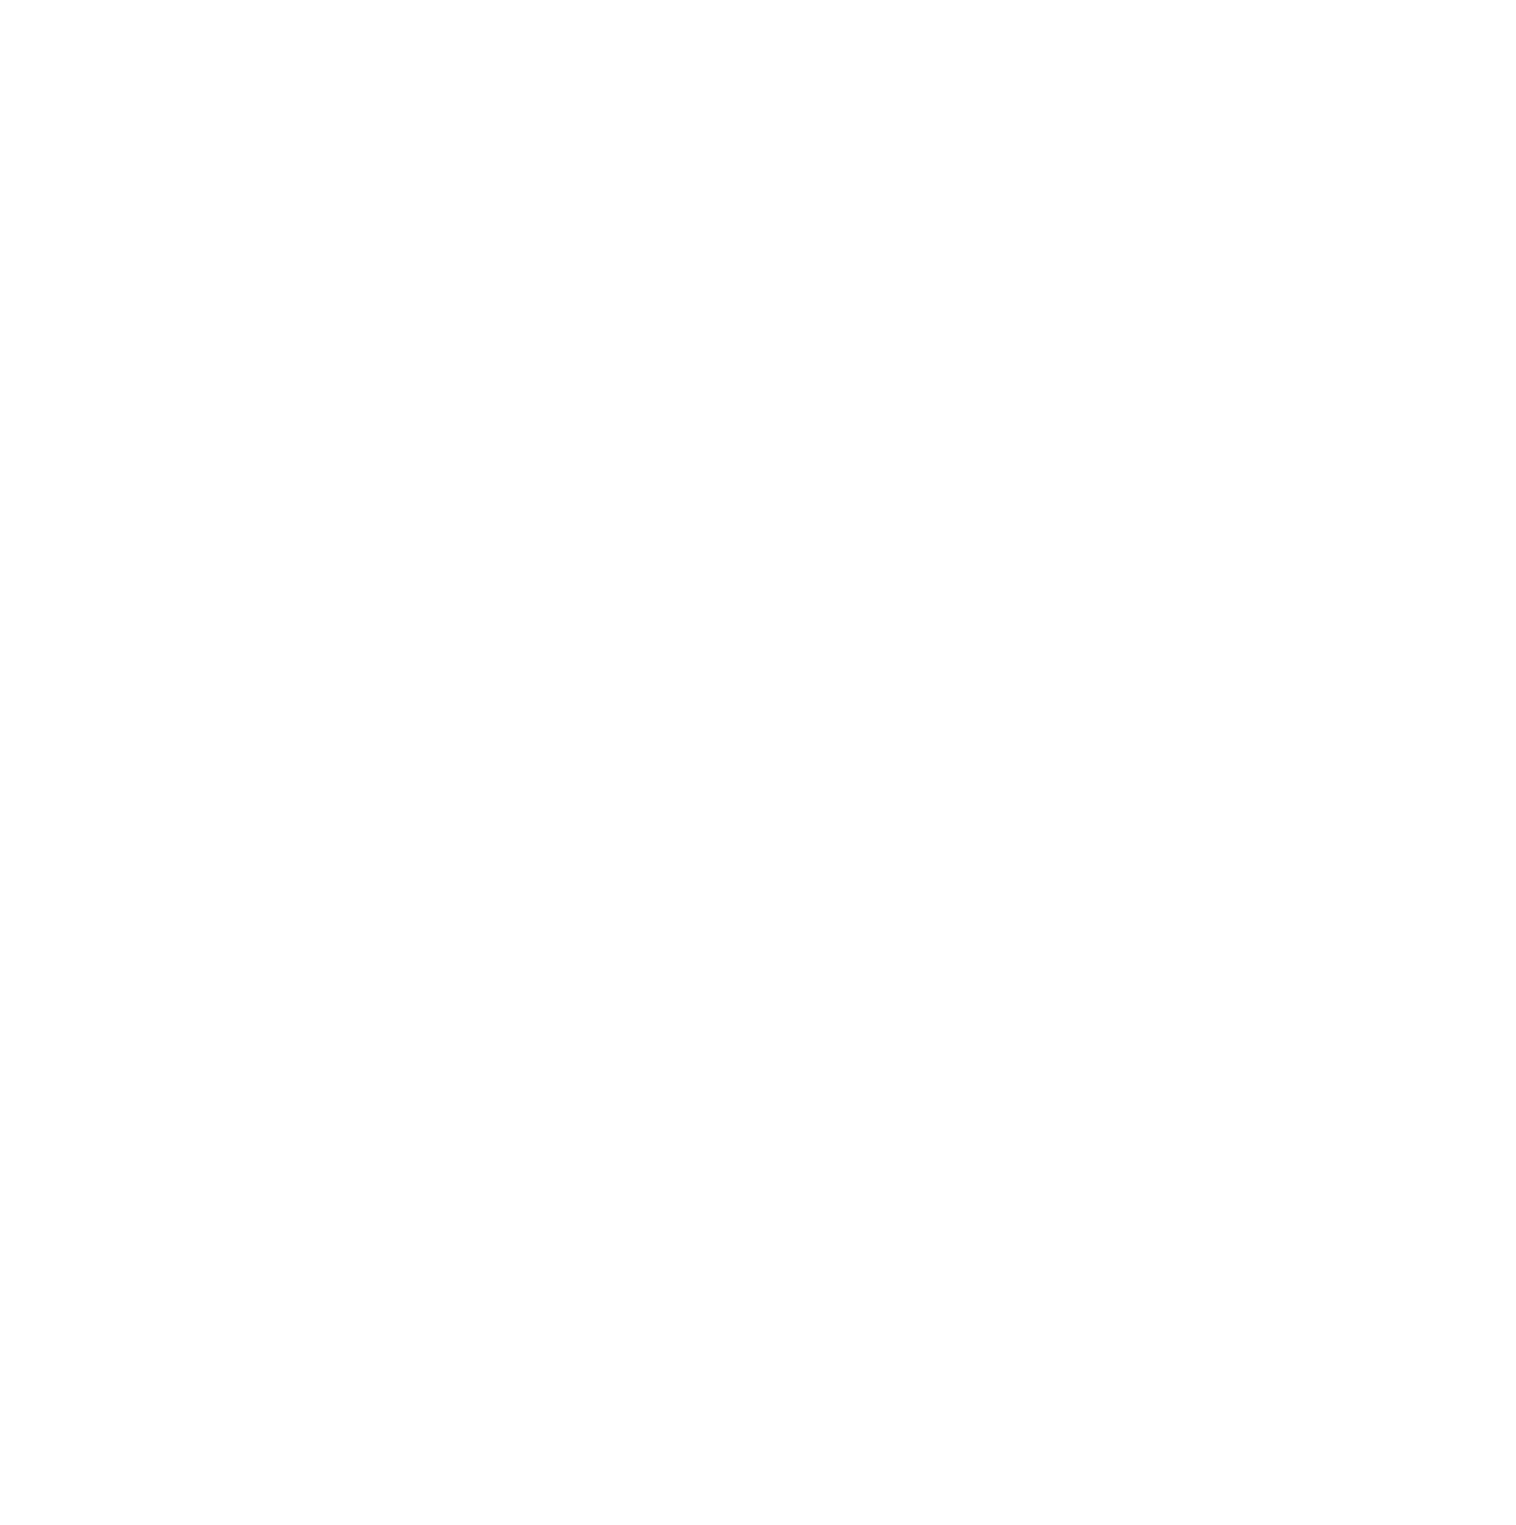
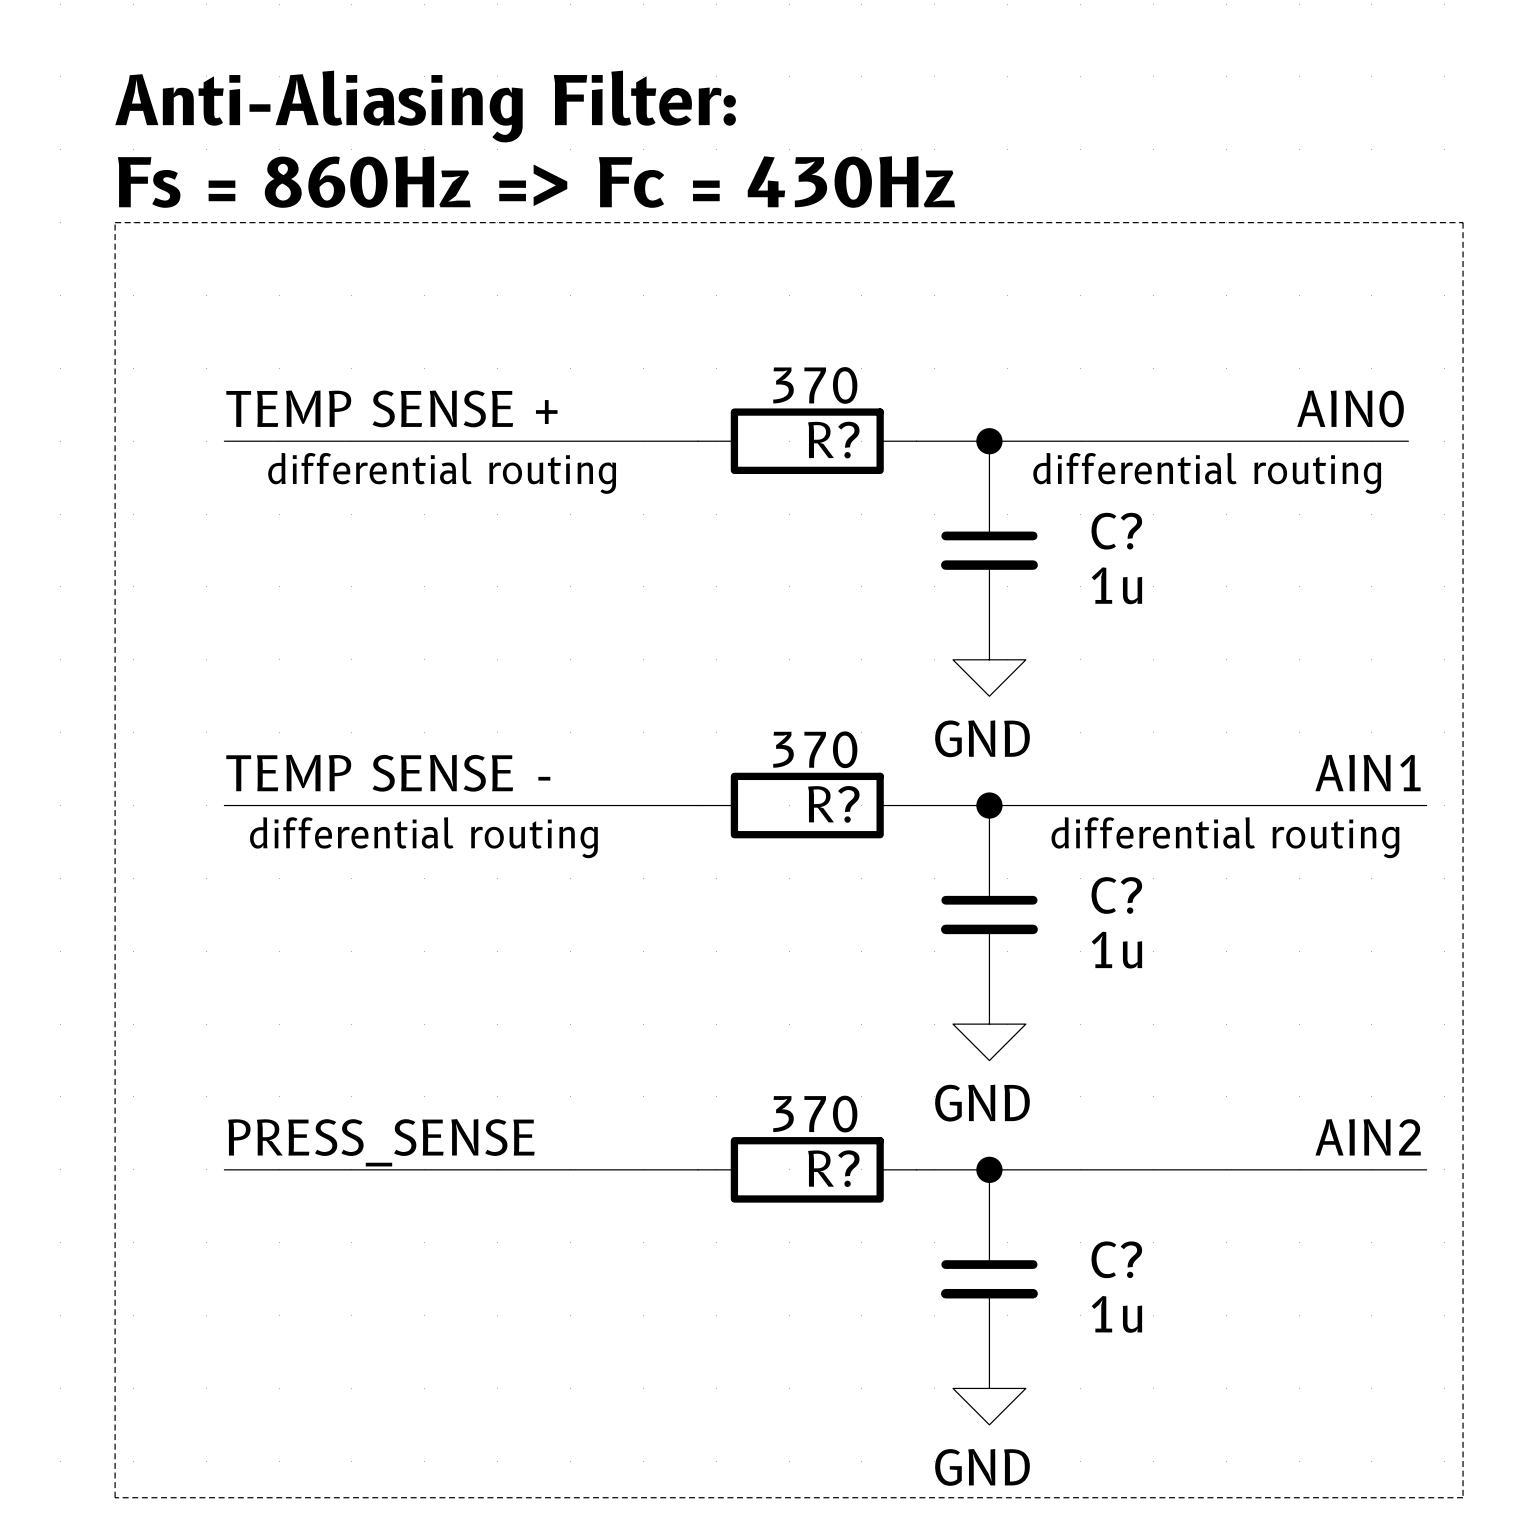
text: none -> Anti-Aliasing Filter: (425, 106)
text: none -> Fs = 860Hz => Fc = 430Hz (536, 182)
line: none -> (115, 222) (1463, 222) (1463, 1497) (115, 1497) (115, 222)
label: none -> TEMP SENSE + (391, 408)
label: none -> AIN0 (1350, 408)
wire: none -> (224, 441) (697, 441)
R?: none -> 370 (807, 441)
wire: none -> (916, 441) (1408, 441)
wire: none -> (989, 441) (989, 477)
junction: none -> (989, 441)
text: none -> differential routing (442, 473)
text: none -> differential routing (1207, 473)
C?: none -> 1u (989, 550)
power symbol: none -> GND (989, 659)
label: none -> TEMP SENSE - (388, 773)
label: none -> AIN1 (1368, 773)
wire: none -> (224, 805) (697, 805)
R?: none -> 370 (807, 805)
wire: none -> (916, 805) (1426, 805)
wire: none -> (989, 805) (989, 841)
junction: none -> (989, 805)
text: none -> differential routing (423, 837)
text: none -> differential routing (1225, 837)
C?: none -> 1u (989, 914)
power symbol: none -> GND (989, 1024)
label: none -> AIN2 (1368, 1137)
label: none -> PRESS_SENSE (381, 1142)
wire: none -> (224, 1169) (697, 1169)
R?: none -> 370 (807, 1169)
wire: none -> (916, 1169) (1426, 1169)
wire: none -> (989, 1169) (989, 1206)
junction: none -> (989, 1169)
C?: none -> 1u (989, 1279)
power symbol: none -> GND (989, 1388)

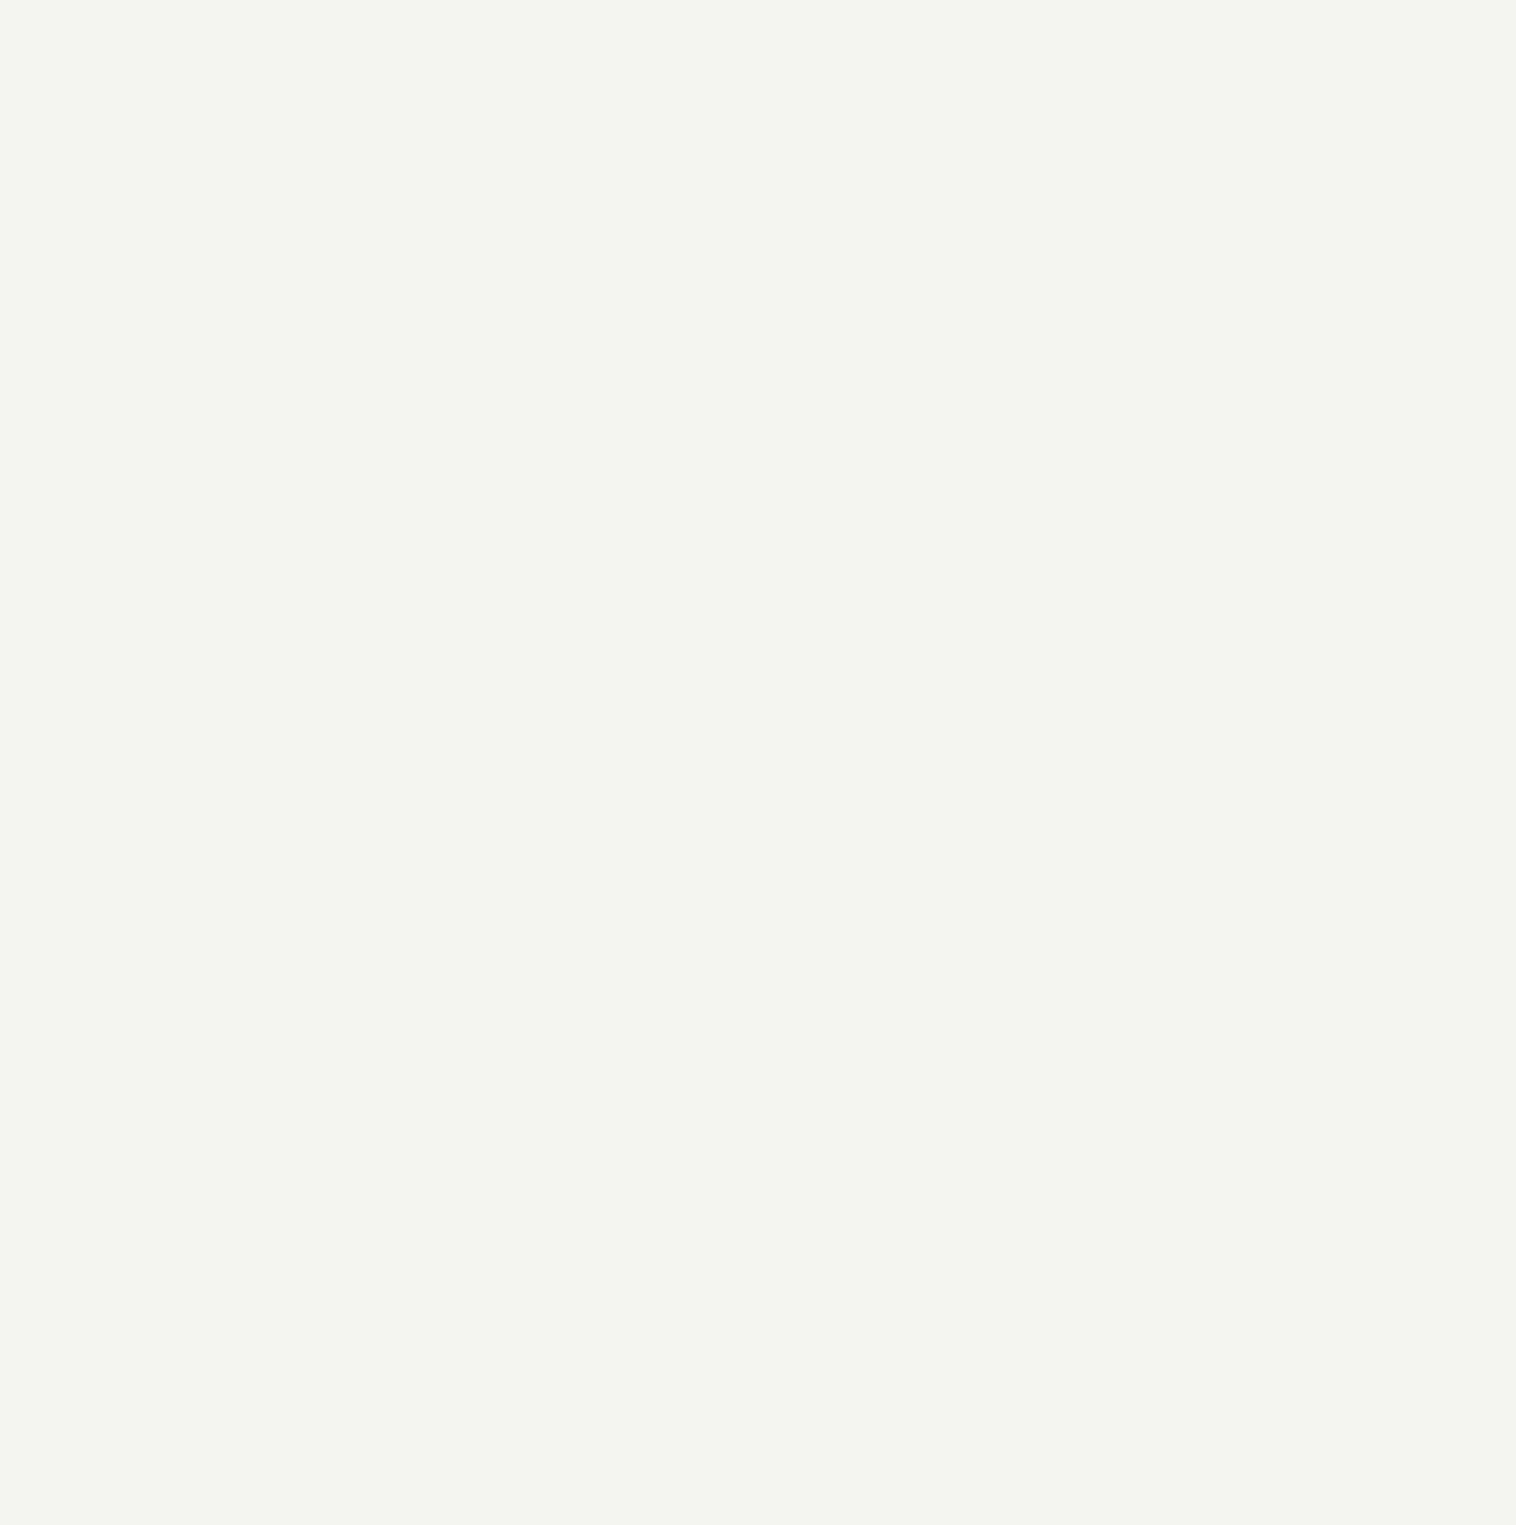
text: Anti-Aliasing Filter: (425, 106) -> none
text: Fs = 860Hz => Fc = 430Hz (536, 182) -> none
line: (115, 222) (1463, 222) (1463, 1497) (115, 1497) (115, 222) -> none
label: TEMP SENSE + (391, 408) -> none
label: AIN0 (1350, 408) -> none
wire: (224, 441) (697, 441) -> none
R?: 370 (807, 441) -> none
wire: (916, 441) (1408, 441) -> none
wire: (989, 441) (989, 477) -> none
junction: (989, 441) -> none
text: differential routing (442, 473) -> none
text: differential routing (1207, 473) -> none
C?: 1u (989, 550) -> none
power symbol: GND (989, 659) -> none
label: TEMP SENSE - (388, 773) -> none
label: AIN1 (1368, 773) -> none
wire: (224, 805) (697, 805) -> none
R?: 370 (807, 805) -> none
wire: (916, 805) (1426, 805) -> none
wire: (989, 805) (989, 841) -> none
junction: (989, 805) -> none
text: differential routing (423, 837) -> none
text: differential routing (1225, 837) -> none
C?: 1u (989, 914) -> none
power symbol: GND (989, 1024) -> none
label: AIN2 (1368, 1137) -> none
label: PRESS_SENSE (381, 1142) -> none
wire: (224, 1169) (697, 1169) -> none
R?: 370 (807, 1169) -> none
wire: (916, 1169) (1426, 1169) -> none
wire: (989, 1169) (989, 1206) -> none
junction: (989, 1169) -> none
C?: 1u (989, 1279) -> none
power symbol: GND (989, 1388) -> none

